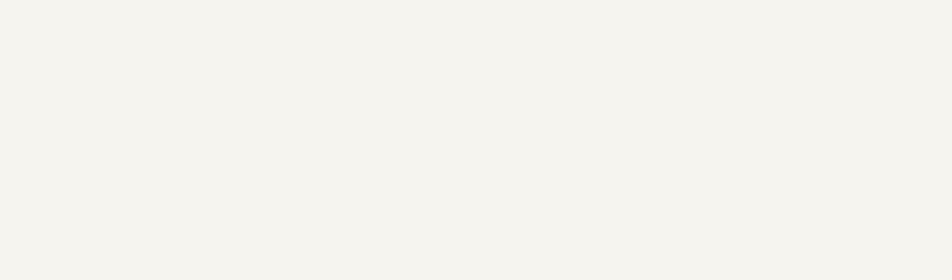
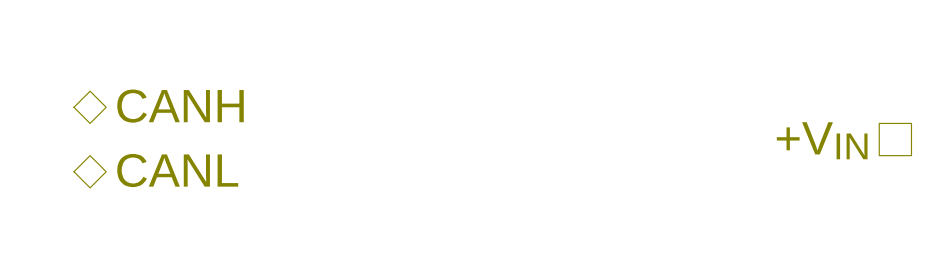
hierarchical label: none -> CANH (180, 106)
hierarchical label: none -> +VIN (822, 140)
hierarchical label: none -> CANL (177, 170)

